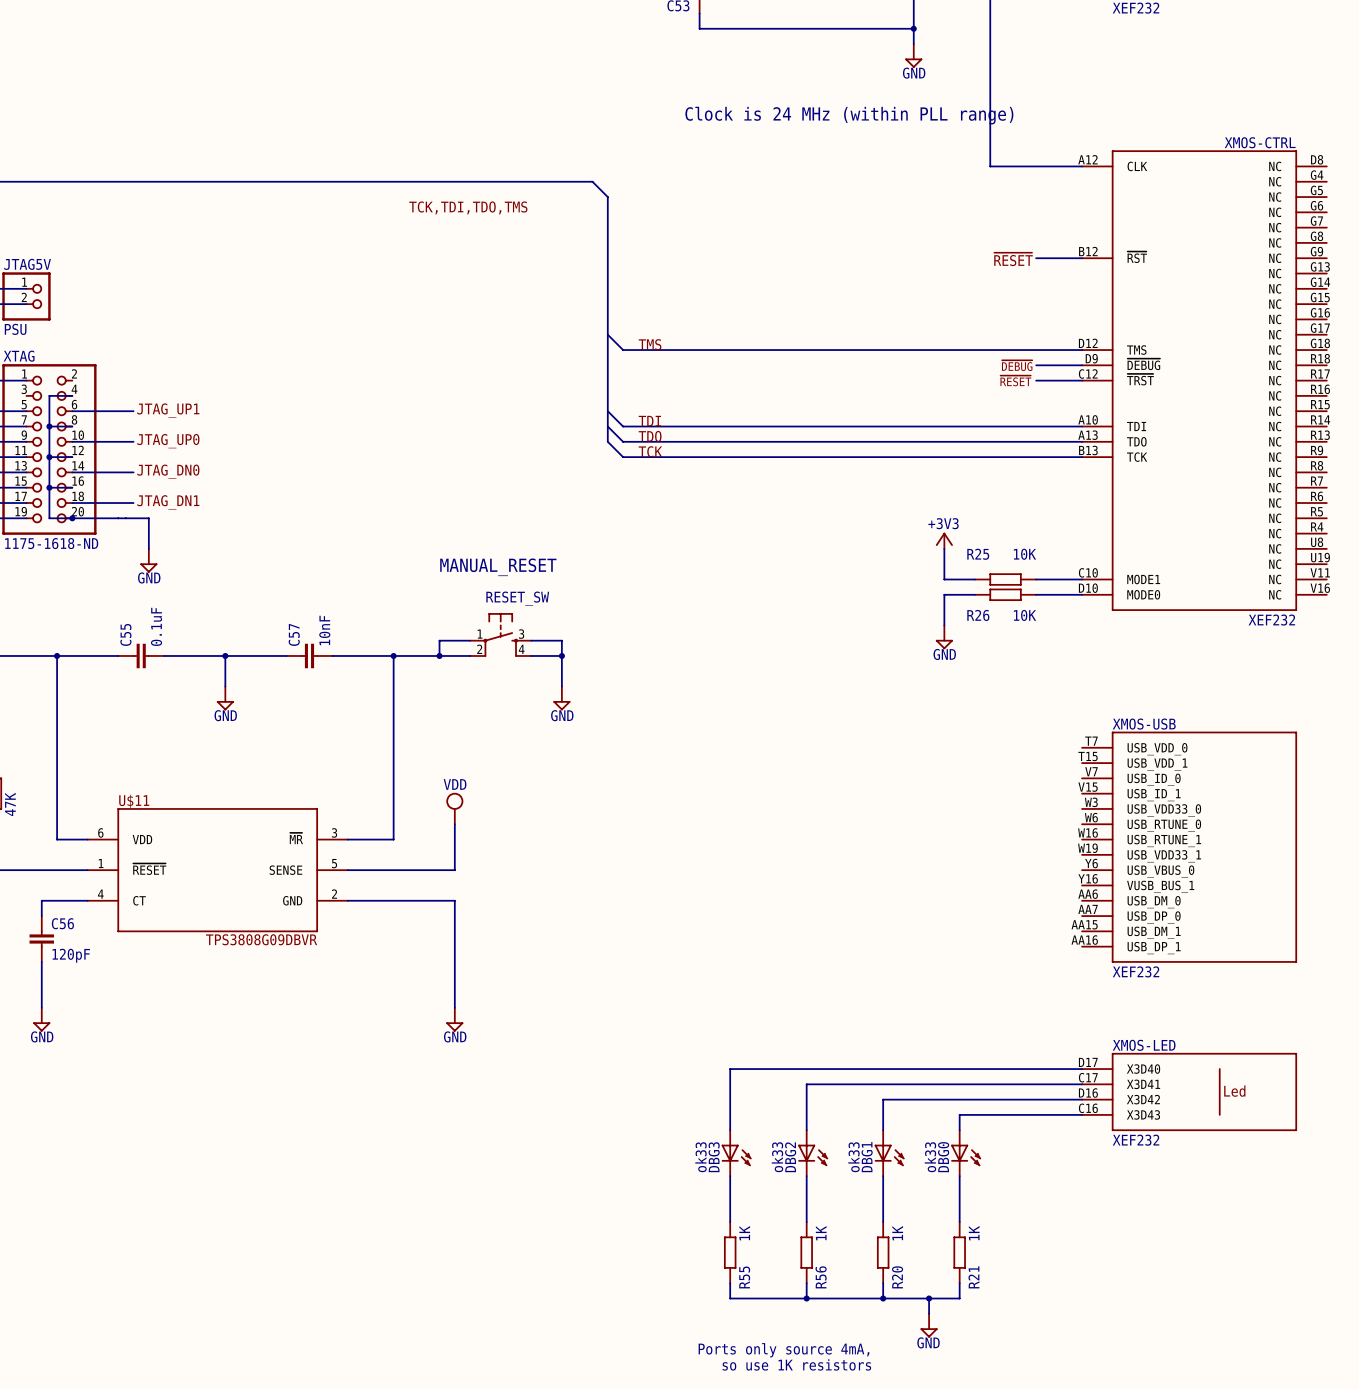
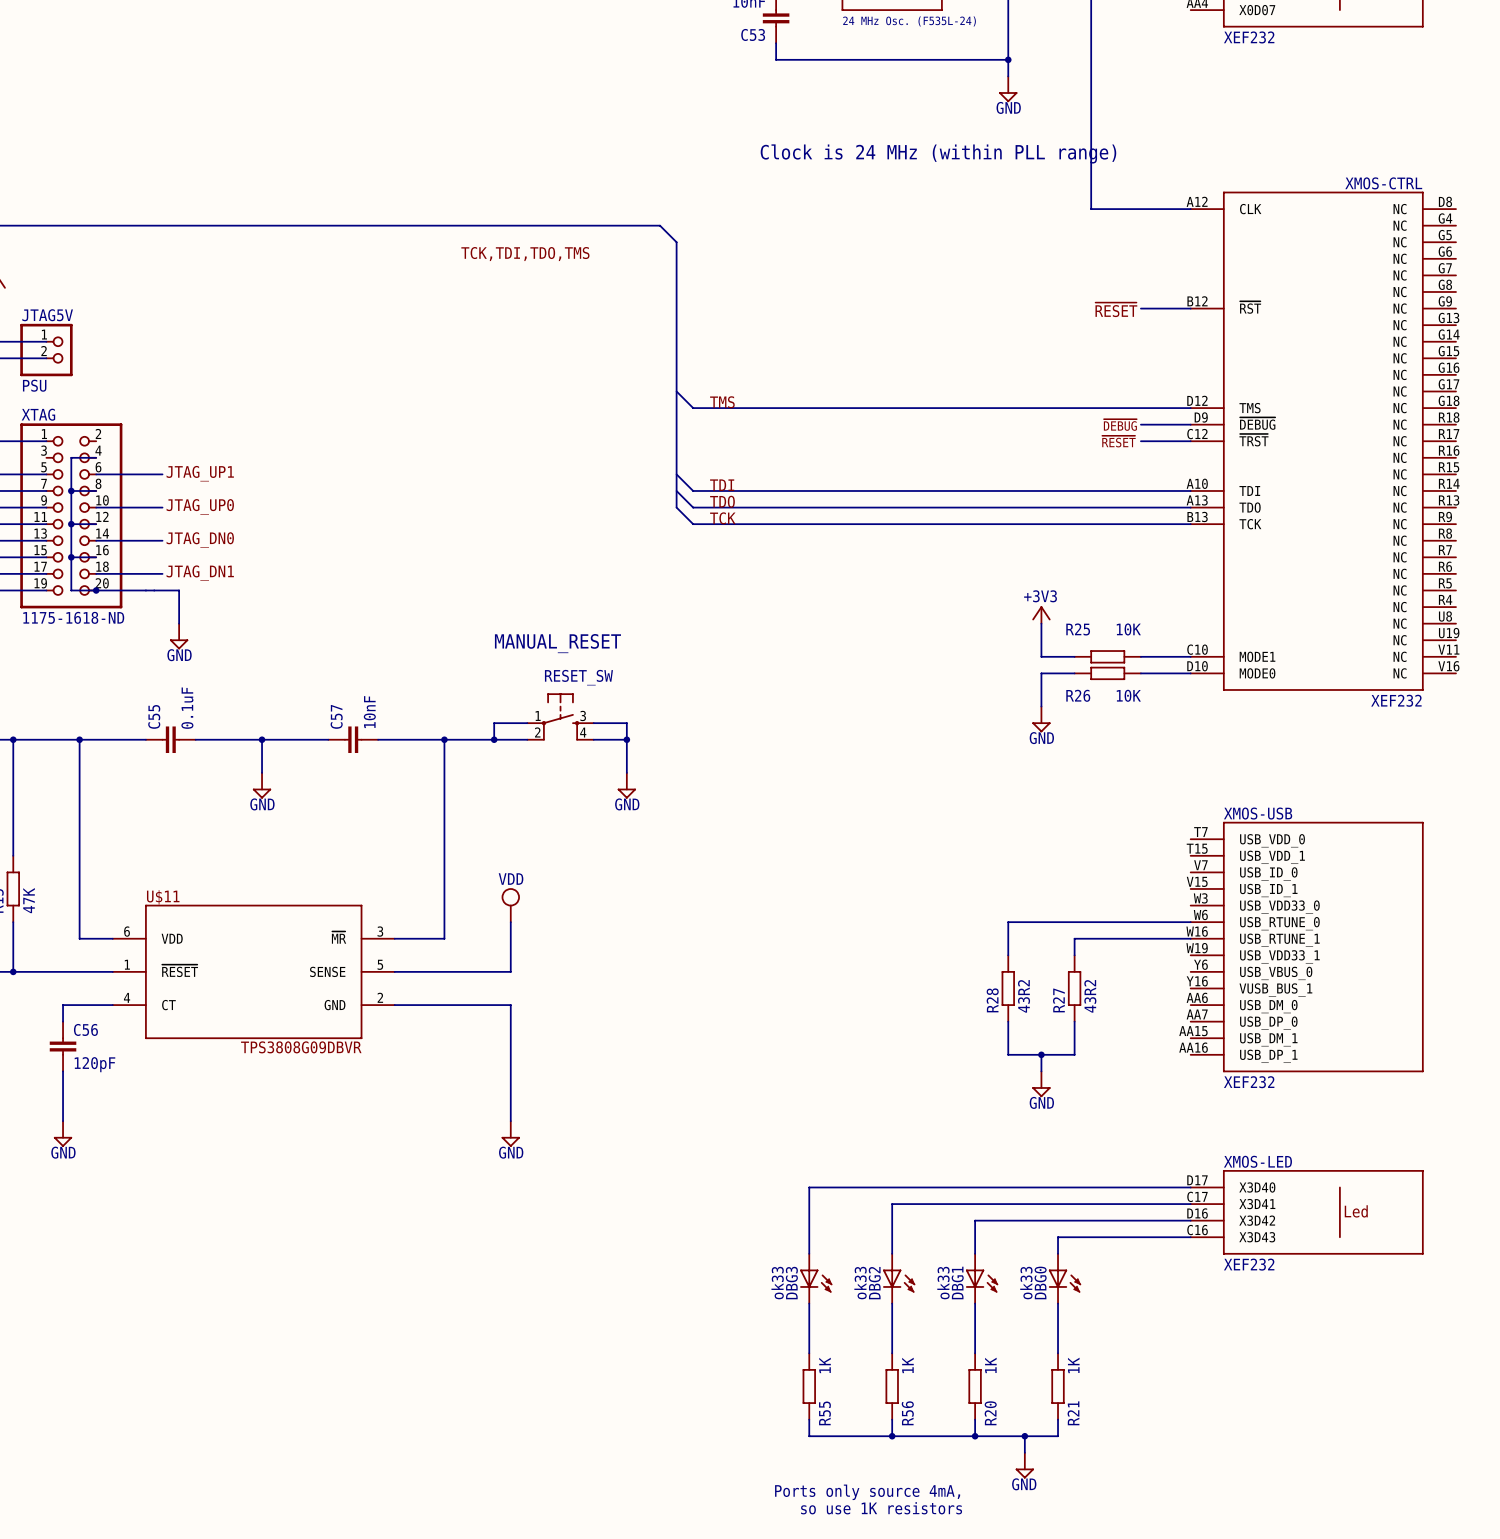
wire: none -> (1190, 922) (1008, 922) (1008, 955)
wire: none -> (1190, 938) (1074, 938) (1074, 955)
R28: none -> 43R2 (1008, 988)
R27: none -> 43R2 (1074, 988)
wire: none -> (1008, 1021) (1008, 1054) (1074, 1054) (1074, 1021)
wire: none -> (1041, 1054) (1041, 1071)
junction: none -> (1041, 1054)
power symbol: none -> GND (1041, 1084)

